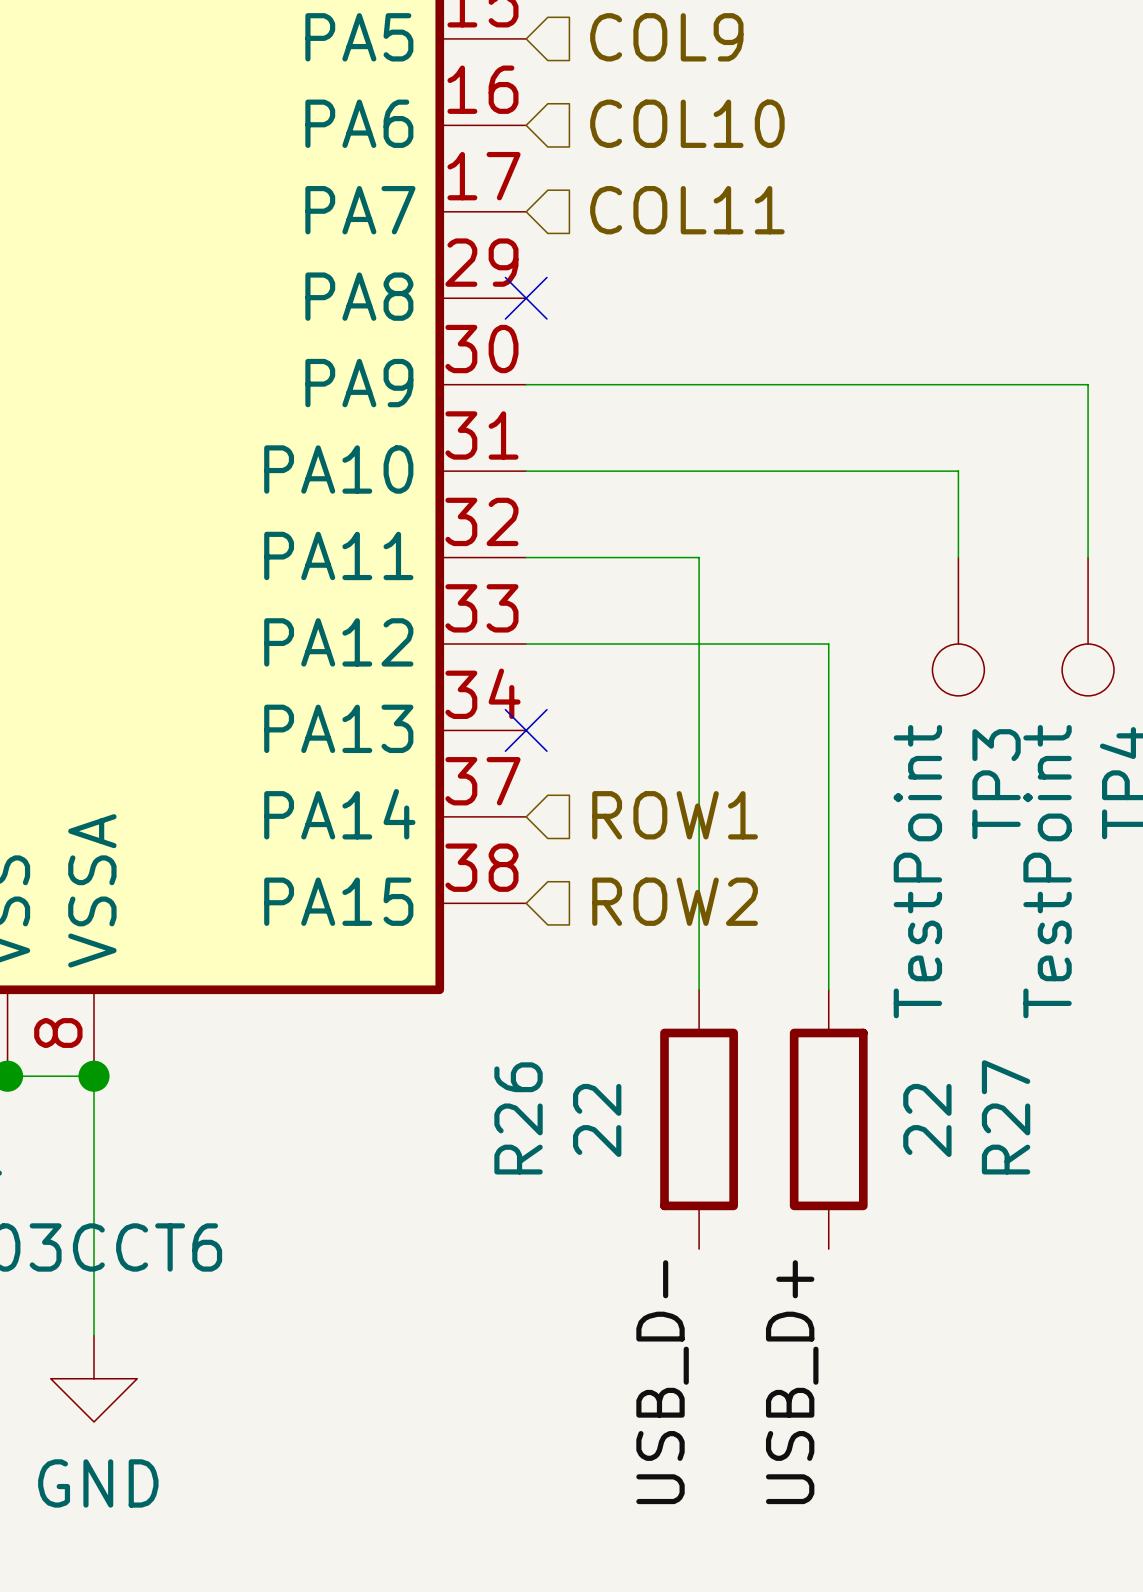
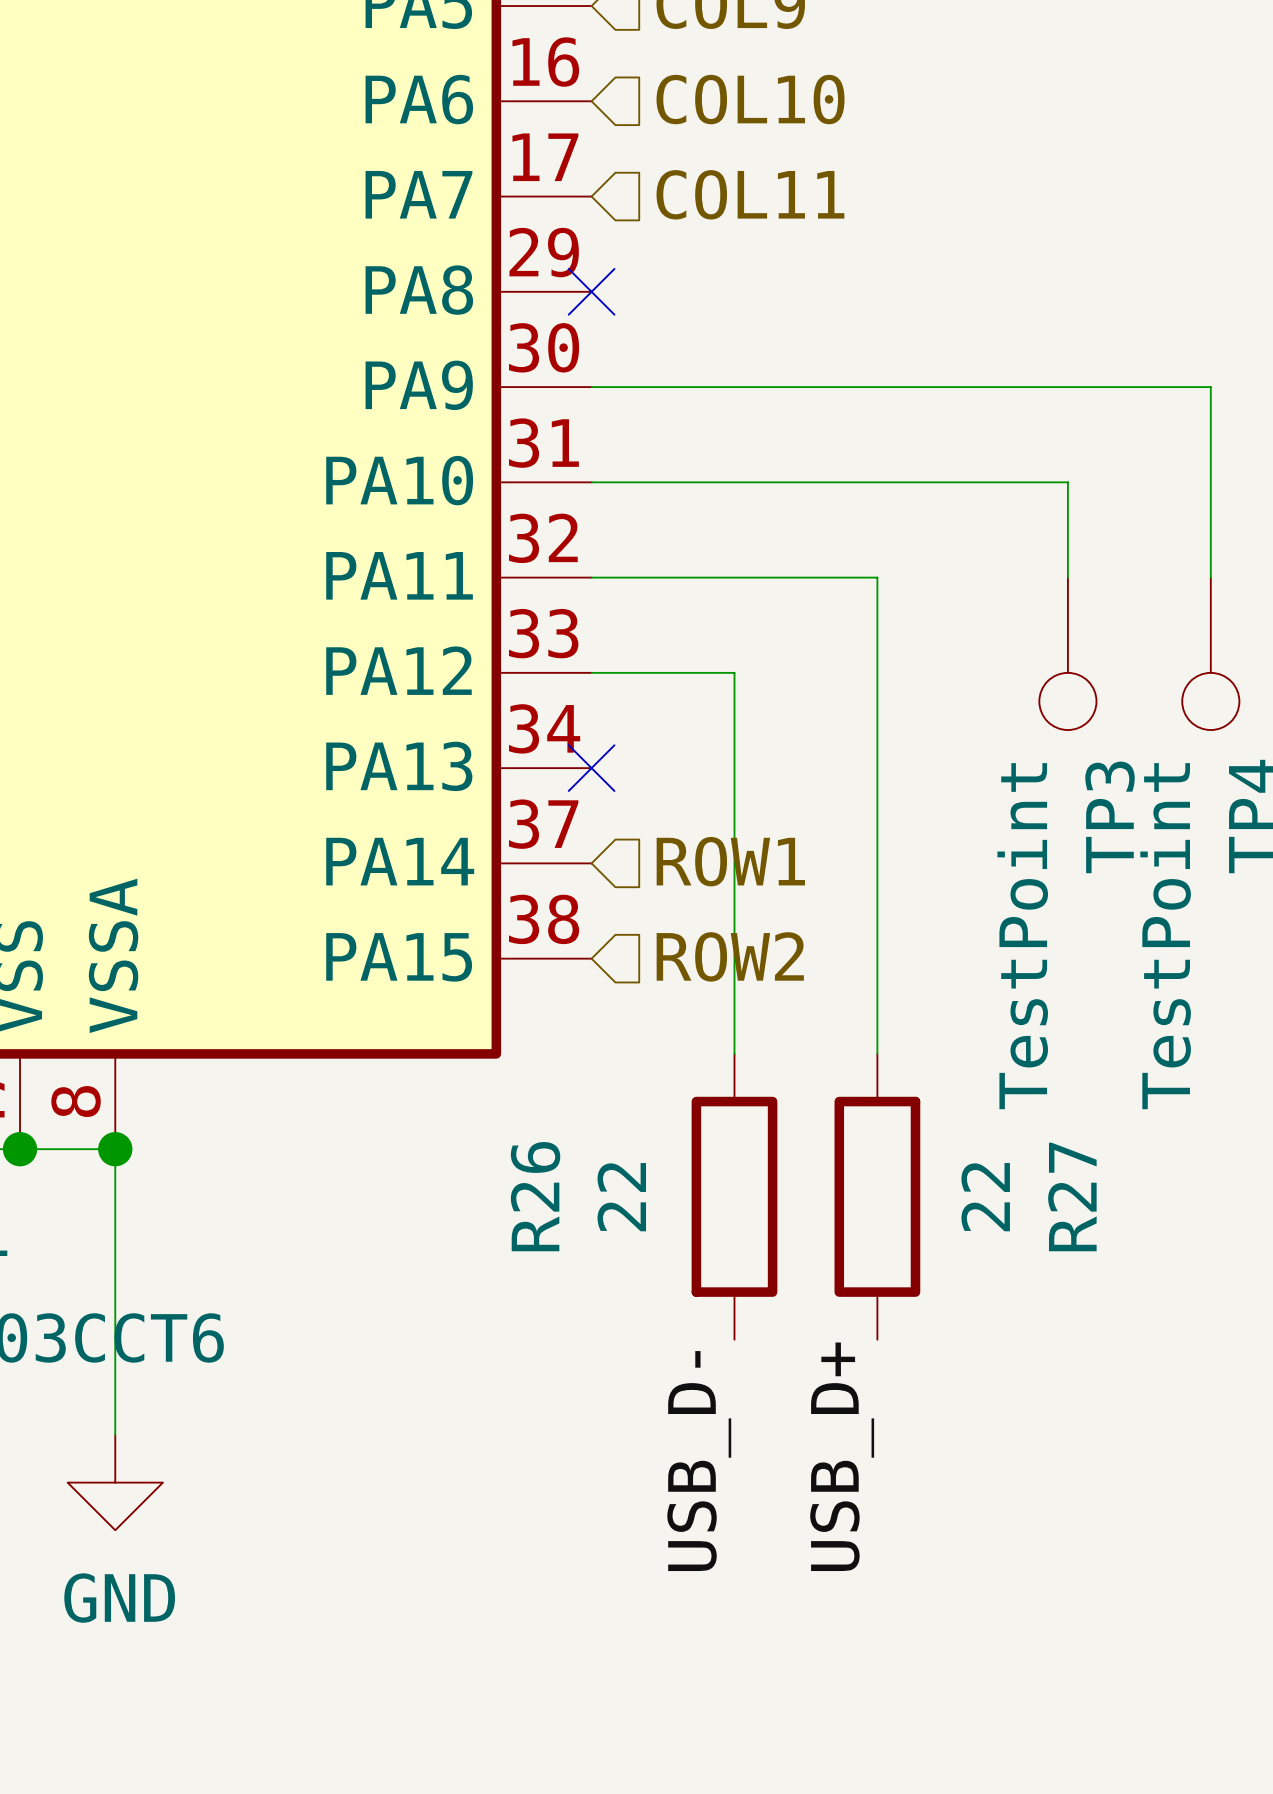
wire: (699, 557) (699, 989) -> (782, 577) (877, 577) (877, 1053)
wire: (655, 644) (828, 644) (828, 989) -> (734, 672) (734, 1053)
R26 position: (699, 1119) -> (734, 1196)
R27 position: (828, 1119) -> (877, 1196)
label position: USB_D- (662, 1382) -> USB_D- (699, 1461)
label position: USB_D+ (792, 1382) -> USB_D+ (842, 1456)

